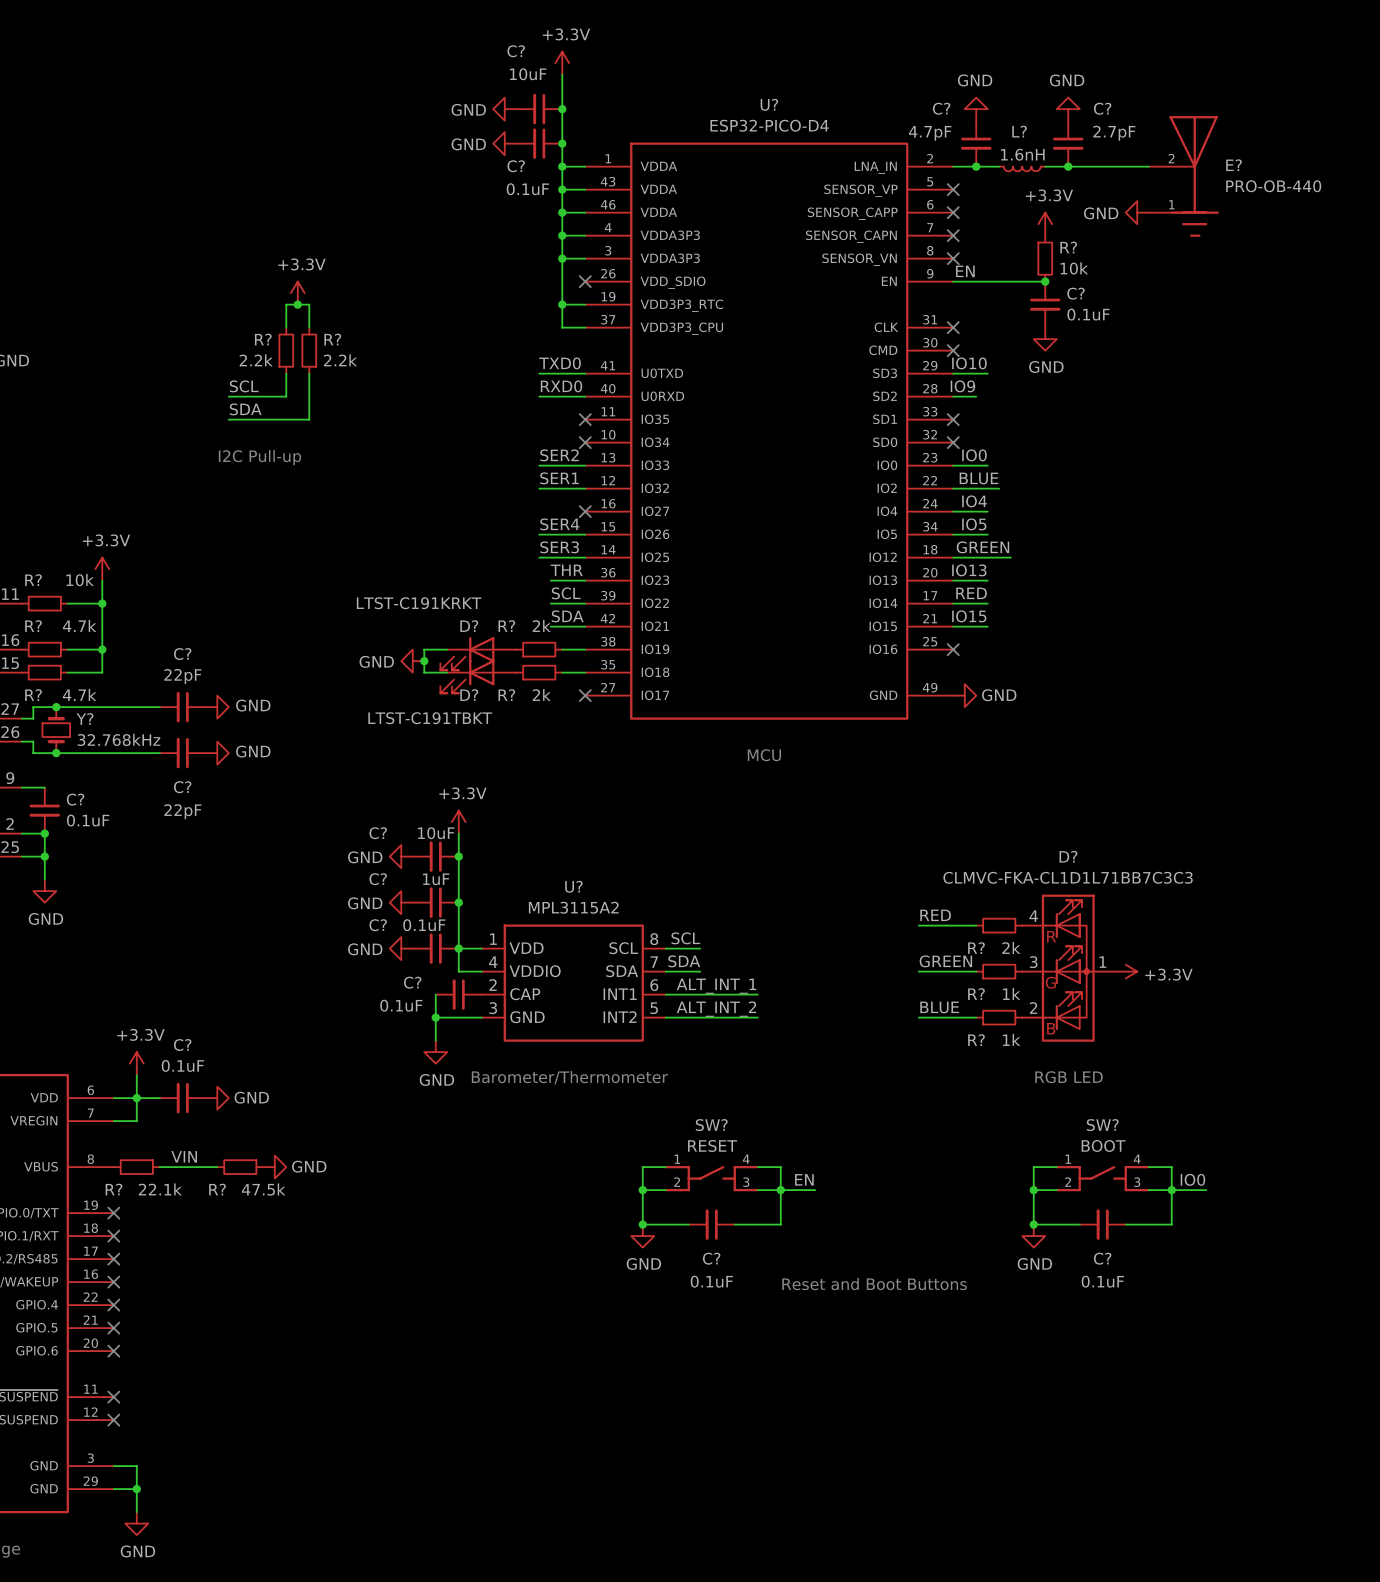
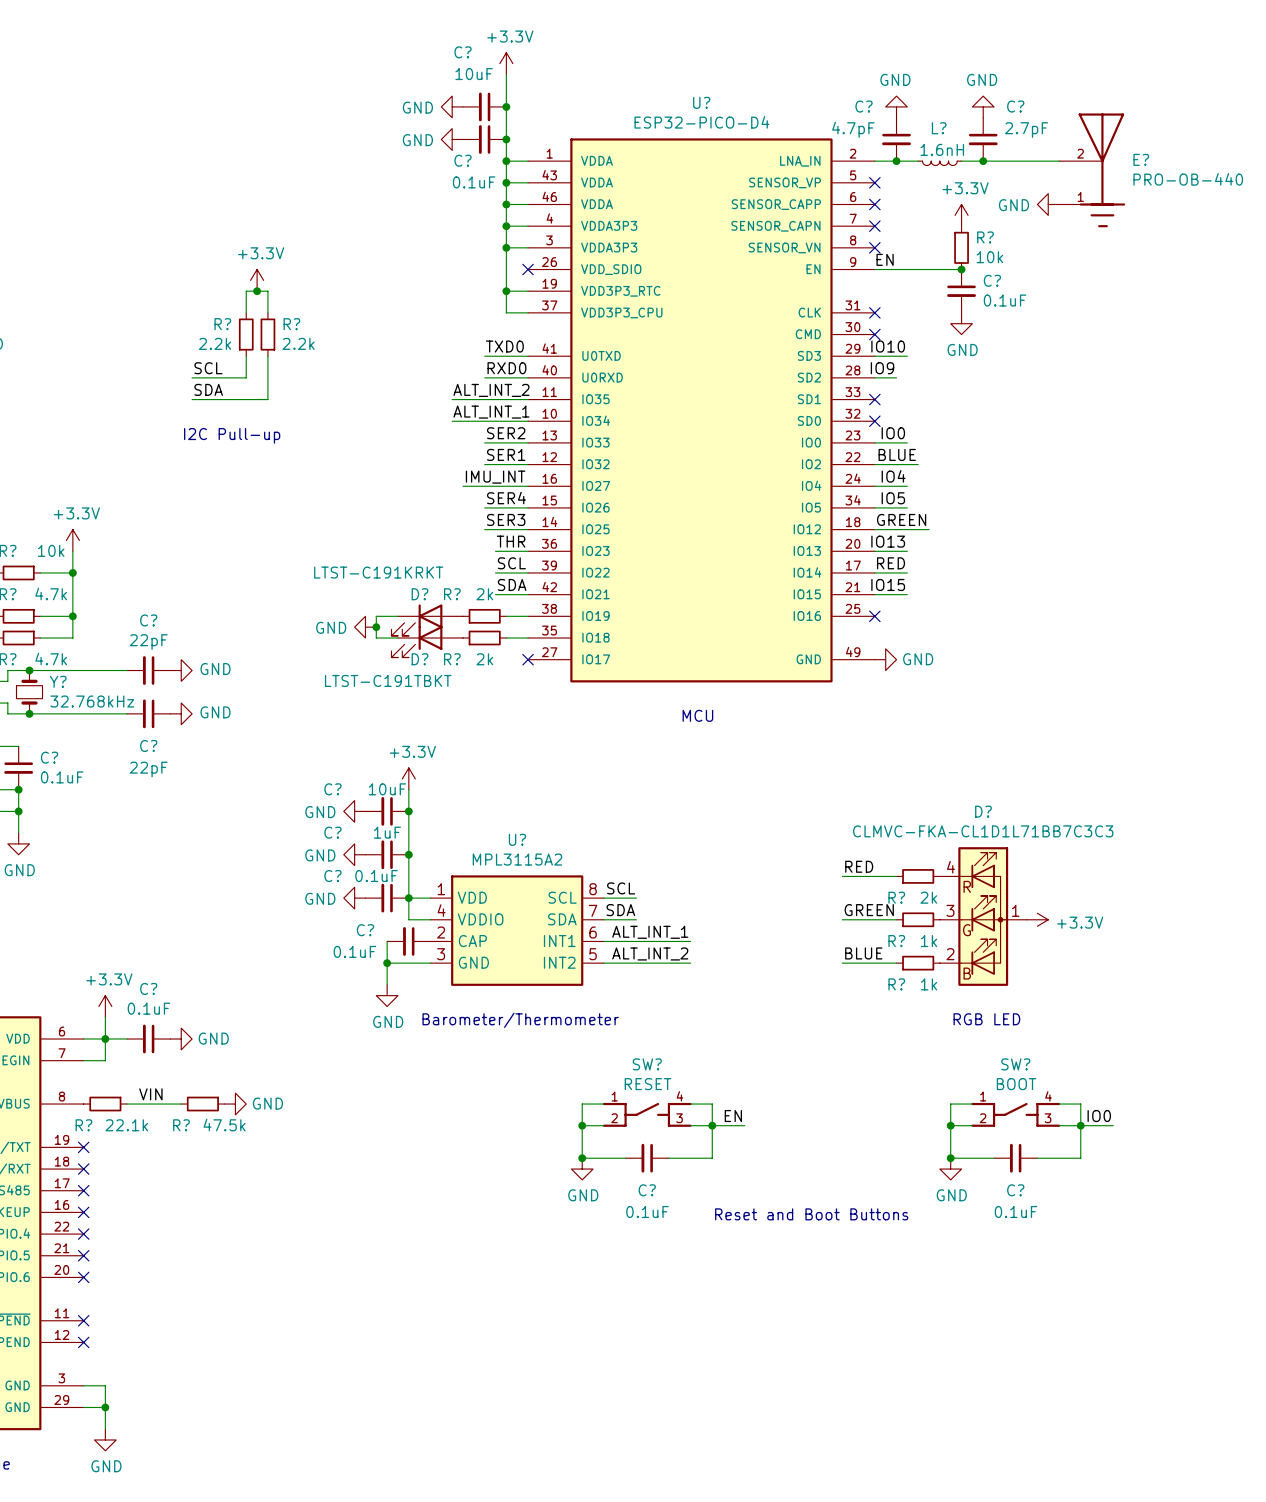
label: none -> ALT_INT_2 (491, 390)
wire: none -> (452, 399) (528, 399)
no-connect mark: (585, 419) -> none
label: none -> ALT_INT_1 (491, 412)
wire: none -> (452, 421) (528, 421)
no-connect mark: (585, 442) -> none
label: none -> IMU_INT (495, 477)
wire: none -> (463, 486) (528, 486)
no-connect mark: (585, 511) -> none

